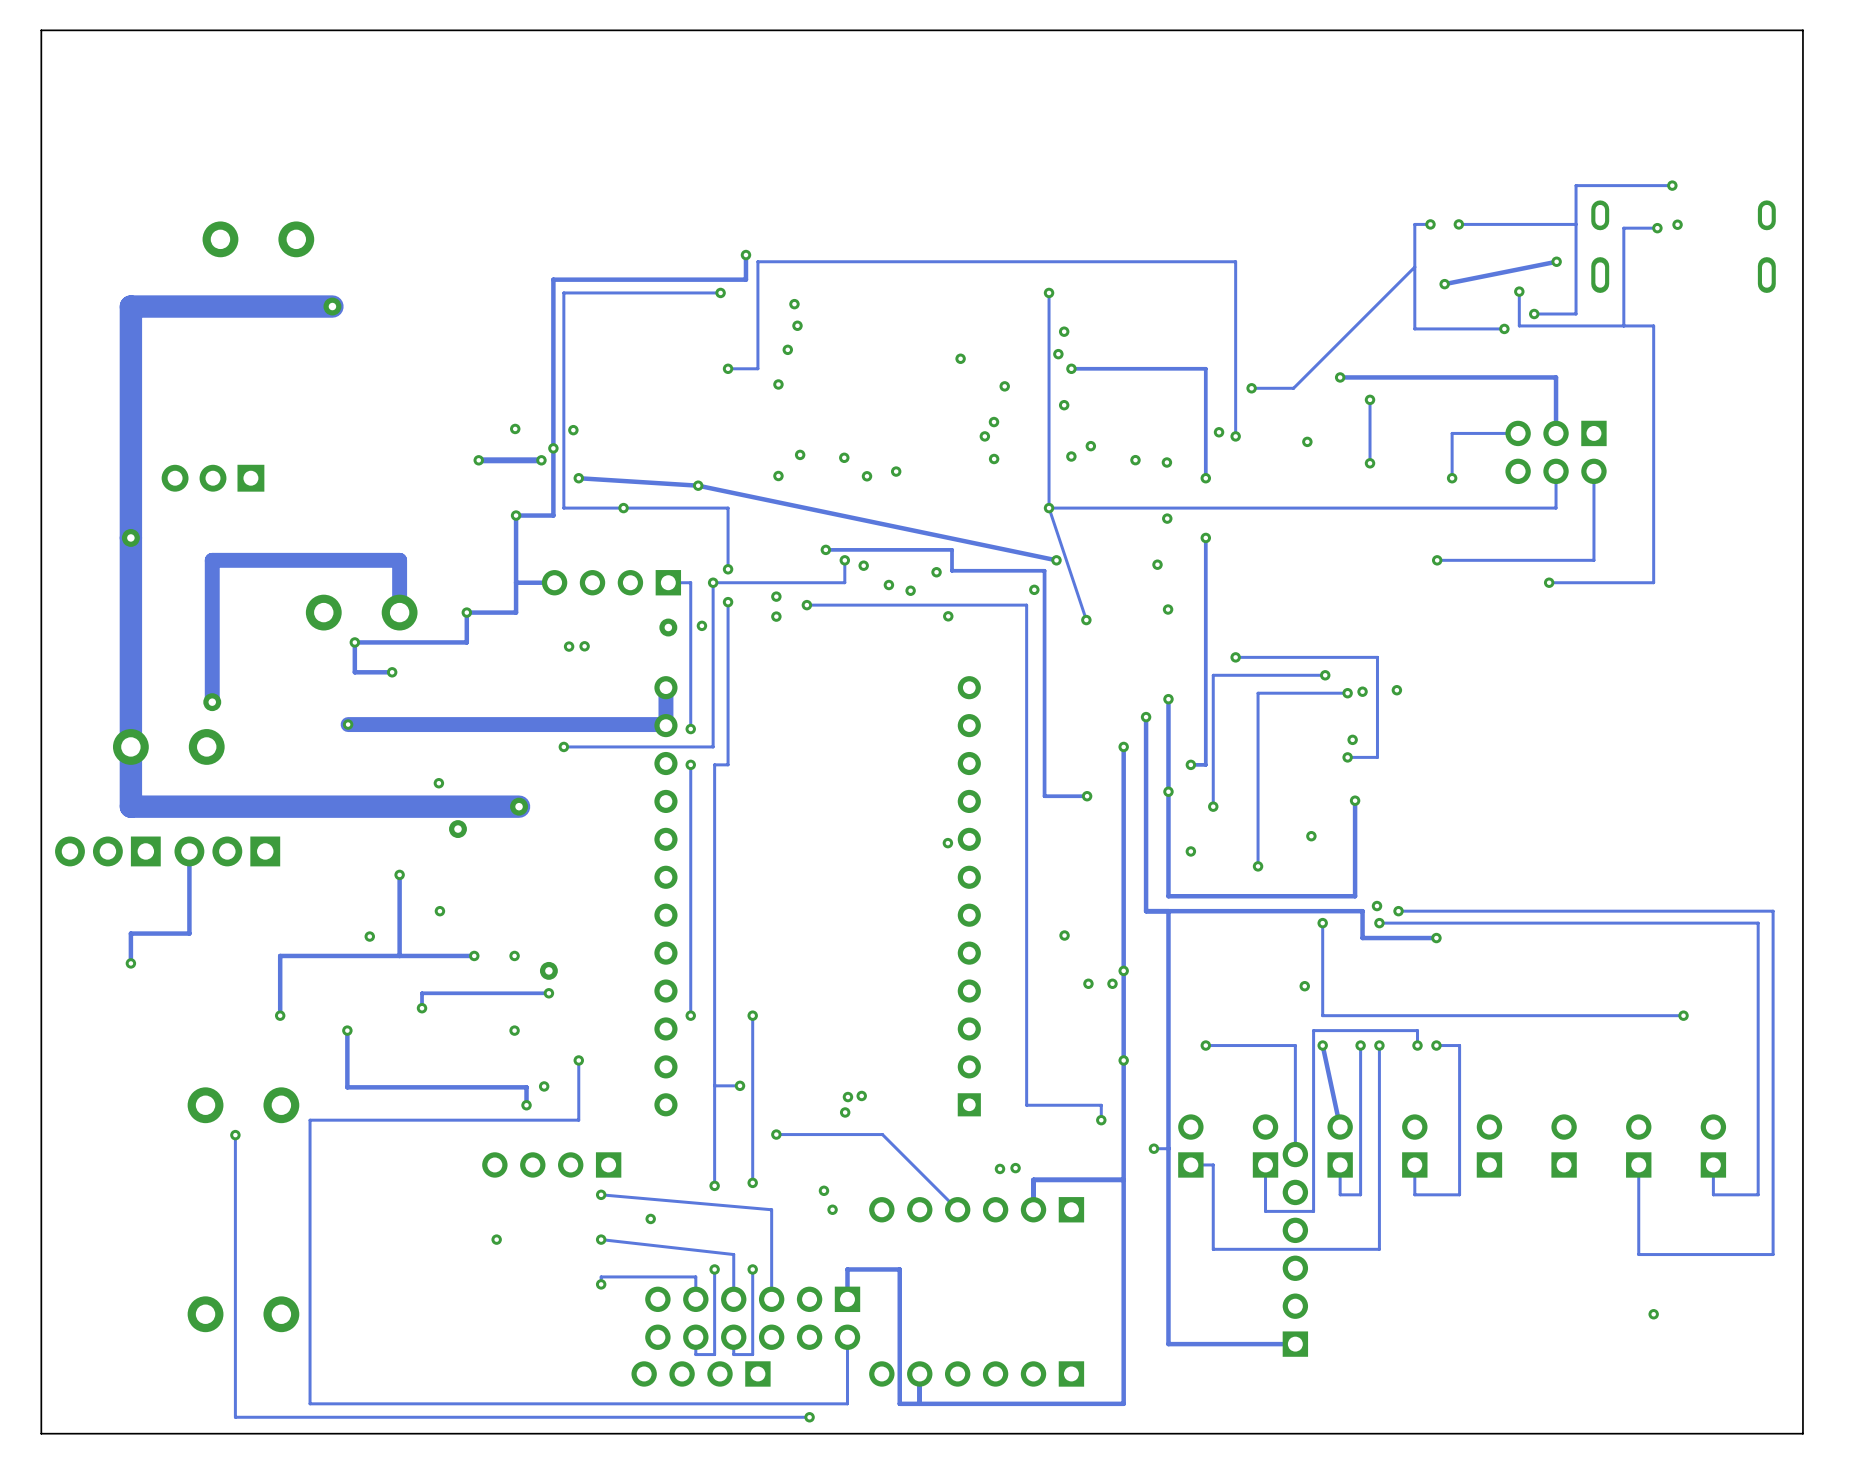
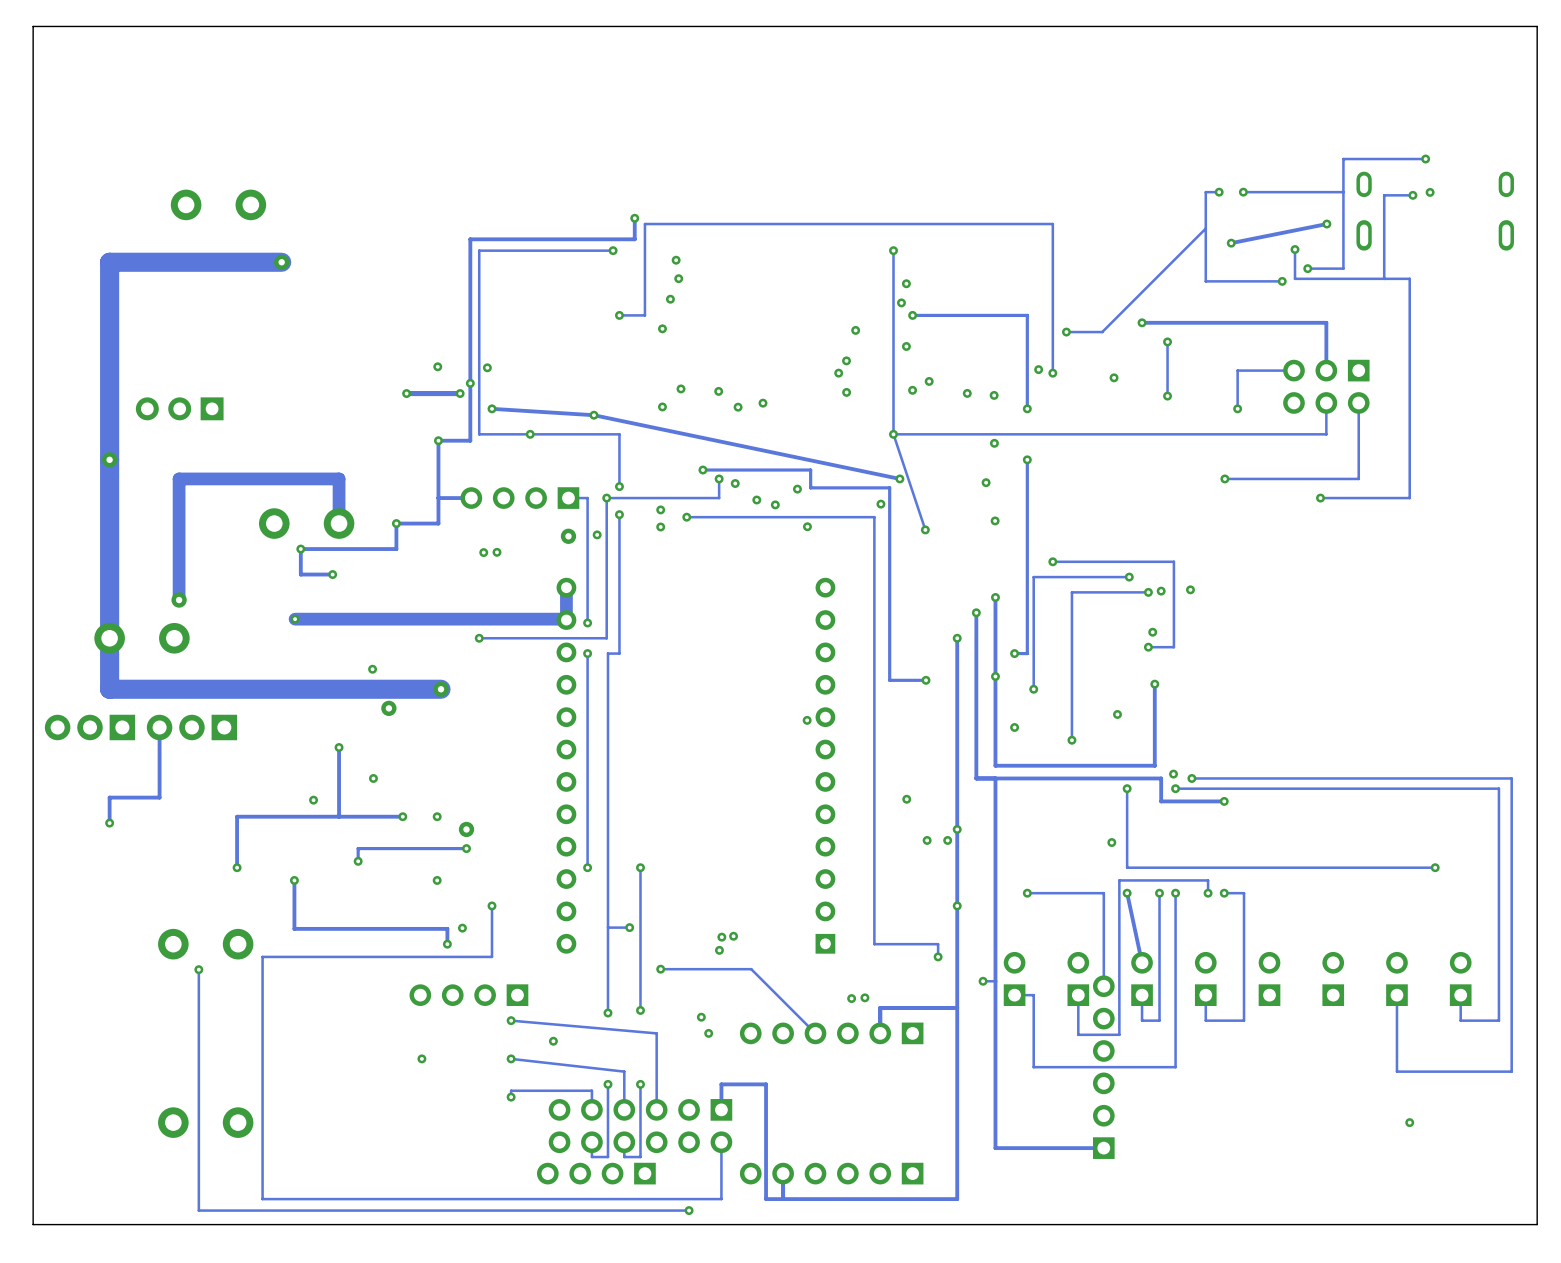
via: (960, 358) -> none

